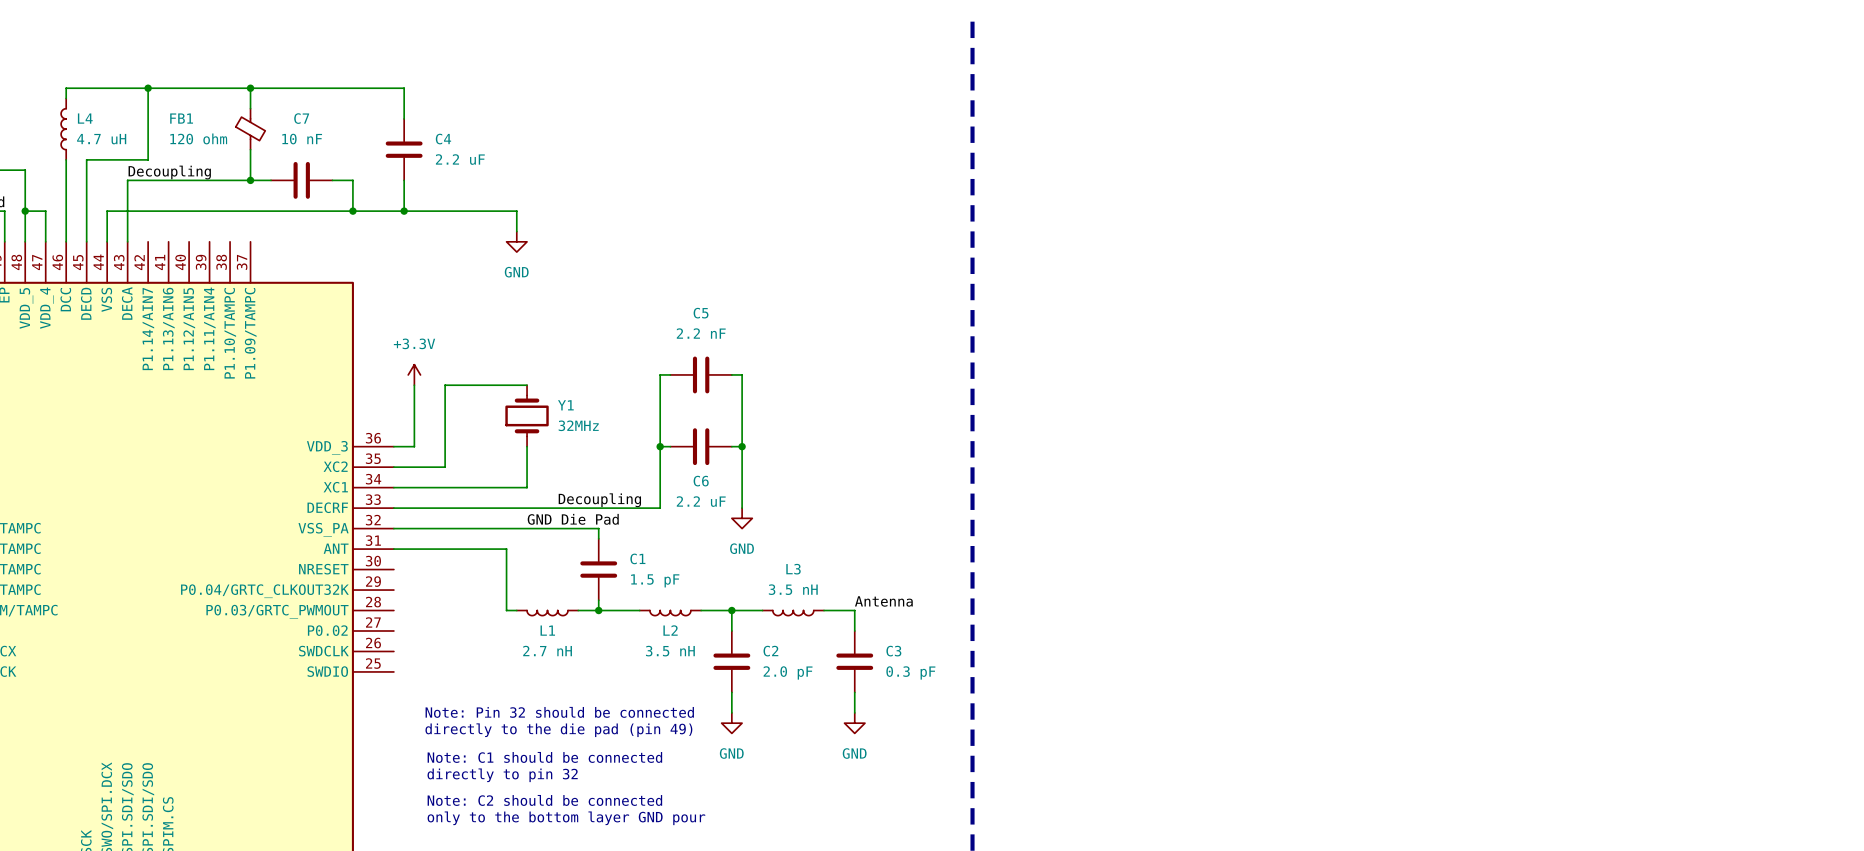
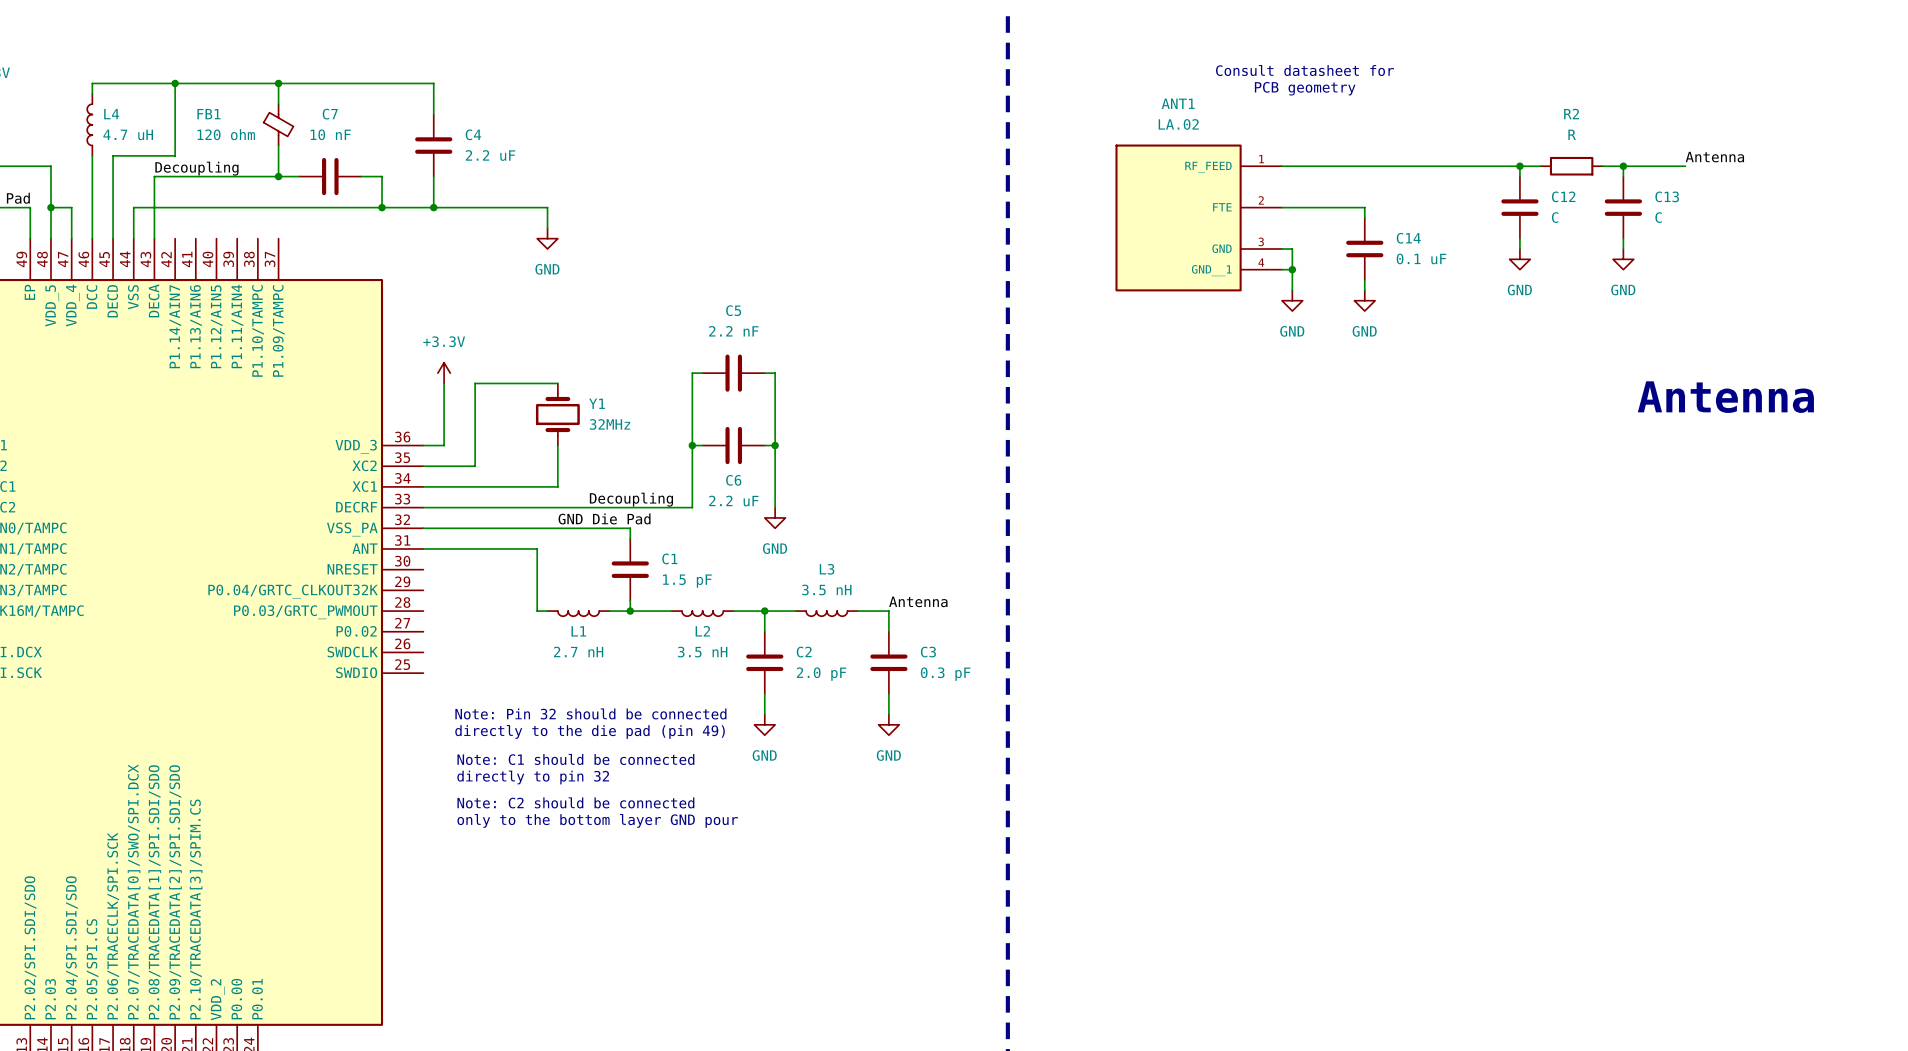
text: none -> Consult datasheet for (1304, 70)
text: none -> PCB geometry (1305, 88)
label: none -> Antenna (1714, 157)
wire: none -> (1282, 166) (1540, 166)
wire: none -> (1519, 166) (1519, 176)
junction: none -> (1519, 166)
R2: none -> R (1571, 166)
wire: none -> (1602, 166) (1685, 166)
wire: none -> (1623, 166) (1623, 176)
junction: none -> (1623, 166)
wire: none -> (1282, 207) (1364, 207) (1364, 217)
C12: none -> C (1519, 207)
C13: none -> C (1623, 207)
ANT1: none -> LA.02 (1198, 217)
wire: none -> (1519, 238) (1519, 248)
wire: none -> (1623, 238) (1623, 248)
wire: none -> (1282, 248) (1292, 248) (1292, 290)
C14: none -> 0.1 uF (1364, 248)
power symbol: none -> GND (1519, 259)
power symbol: none -> GND (1623, 259)
wire: none -> (1282, 269) (1292, 269)
junction: none -> (1292, 269)
wire: none -> (1364, 280) (1364, 290)
power symbol: none -> GND (1292, 300)
power symbol: none -> GND (1364, 300)
text: none -> Antenna (1725, 397)

